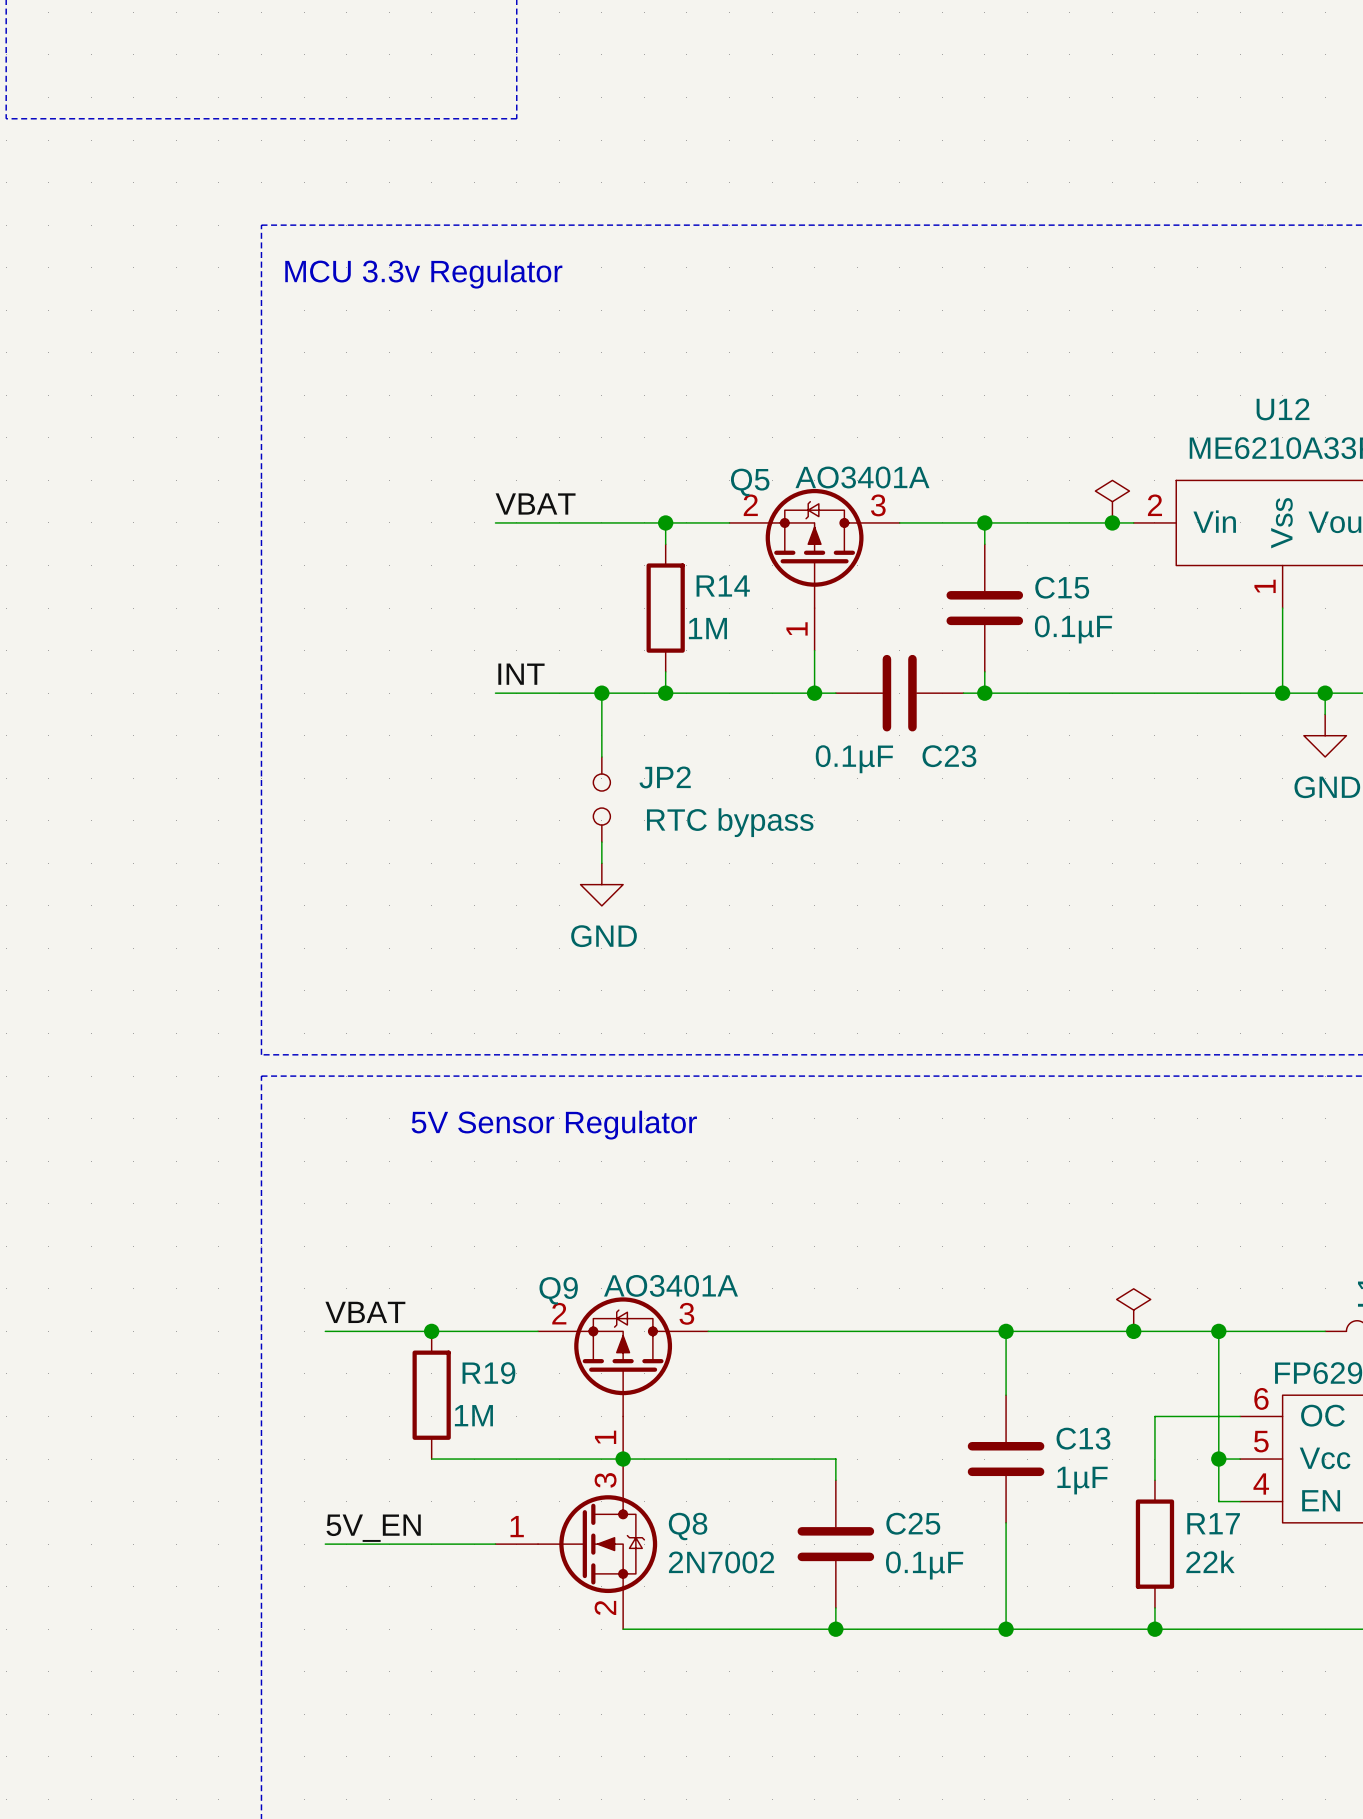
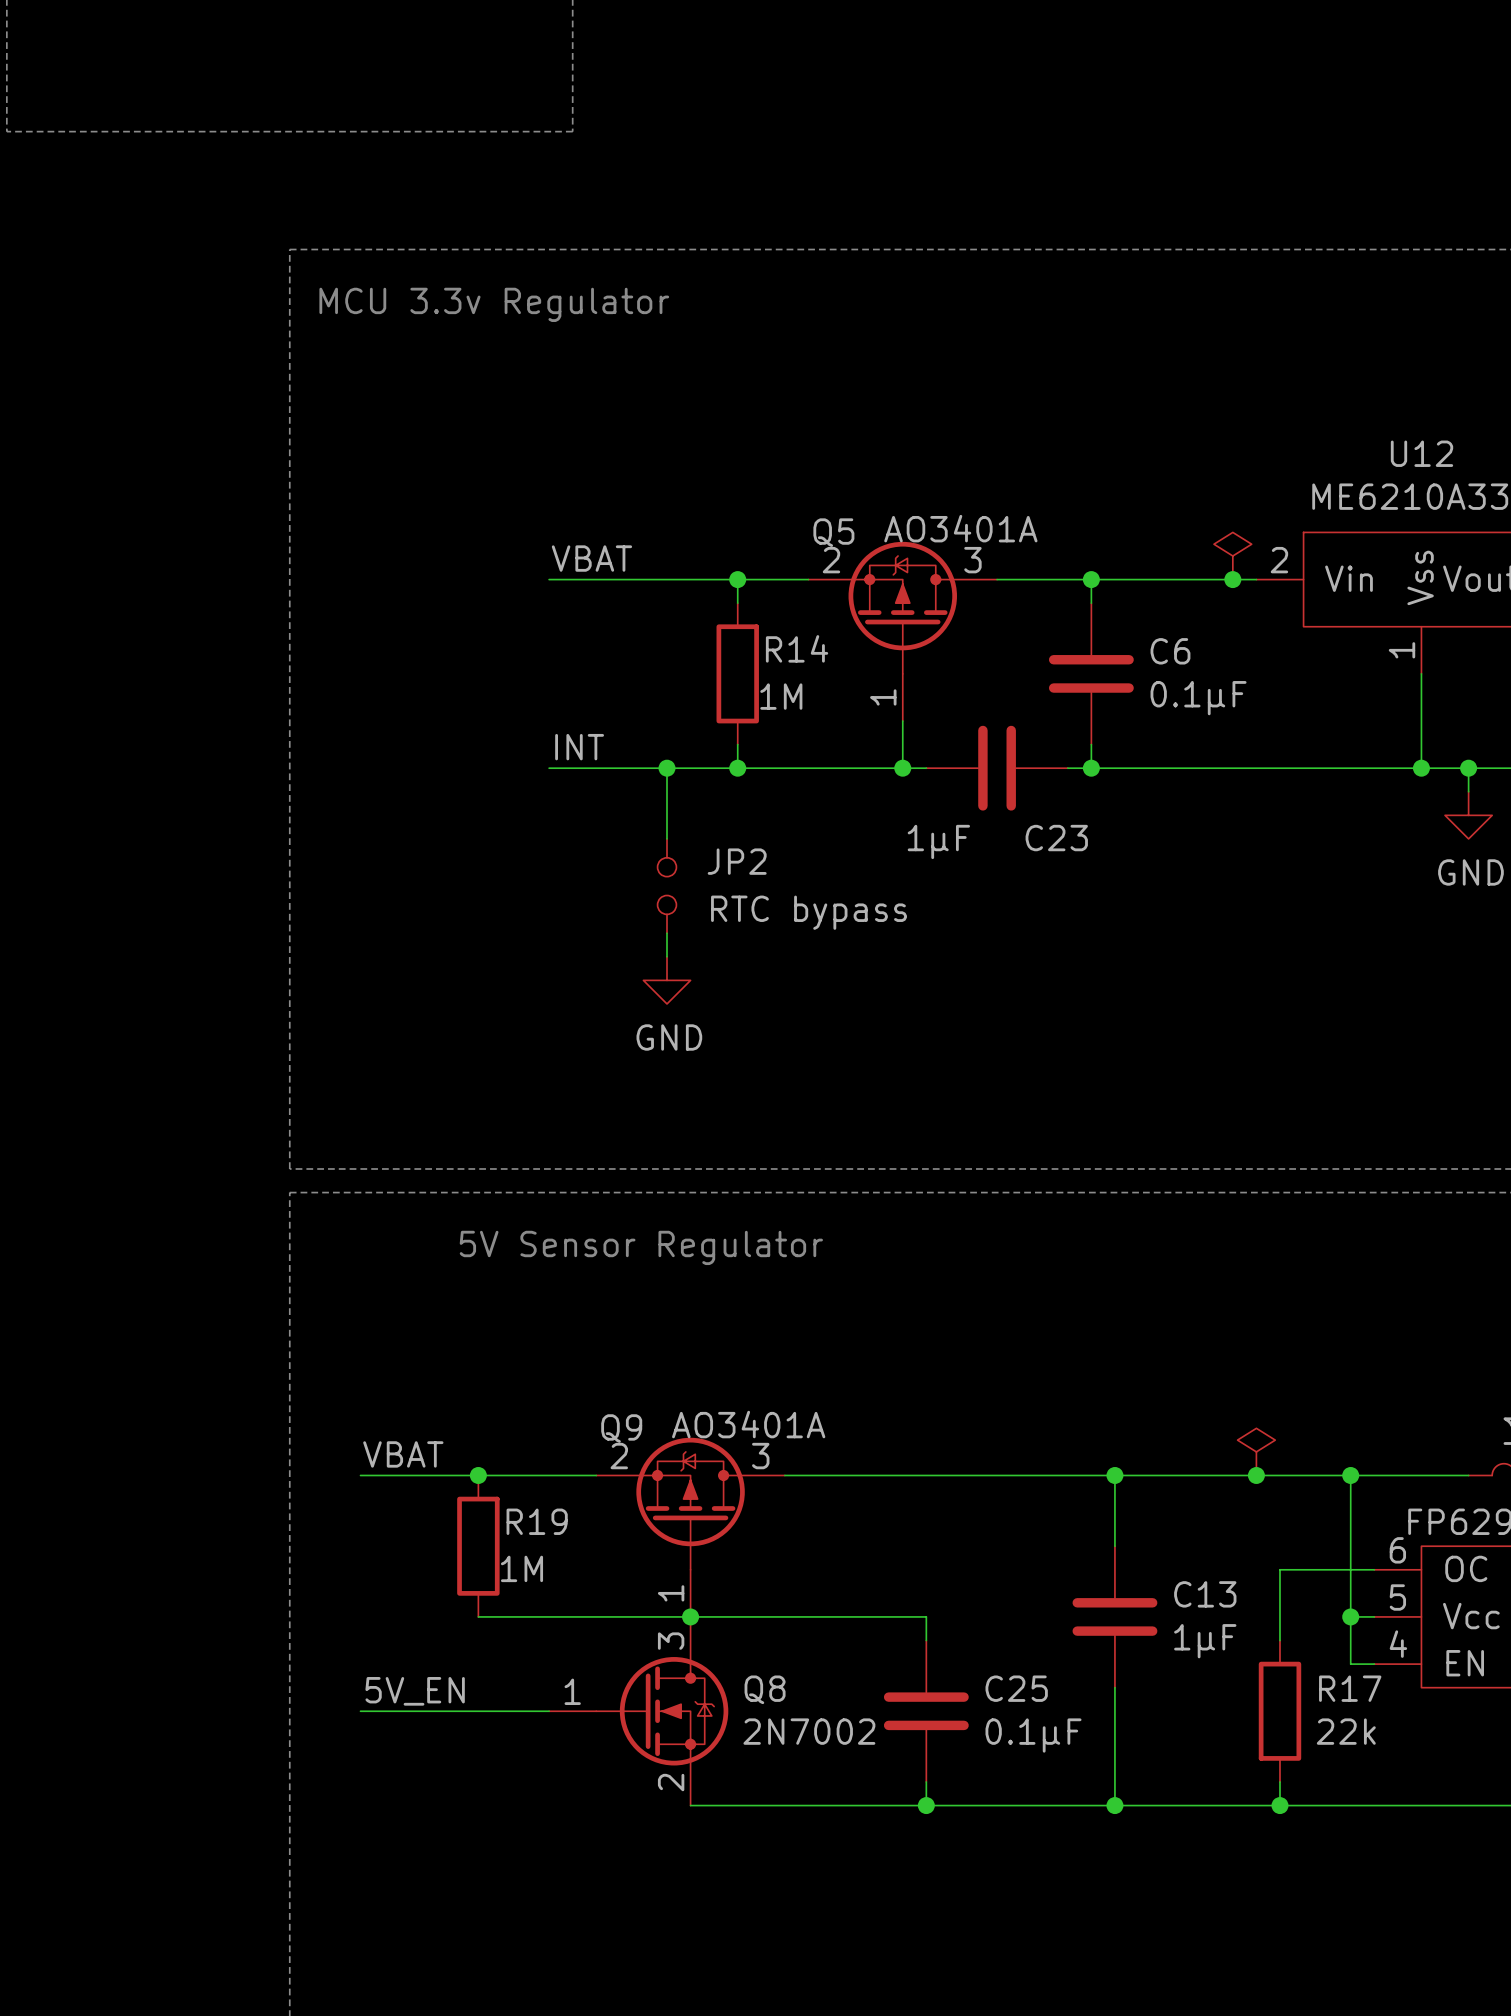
C15 name: C15 (1062, 587) -> C6 (1170, 651)
C23 value: 0.1µF (854, 759) -> 1µF (938, 841)

